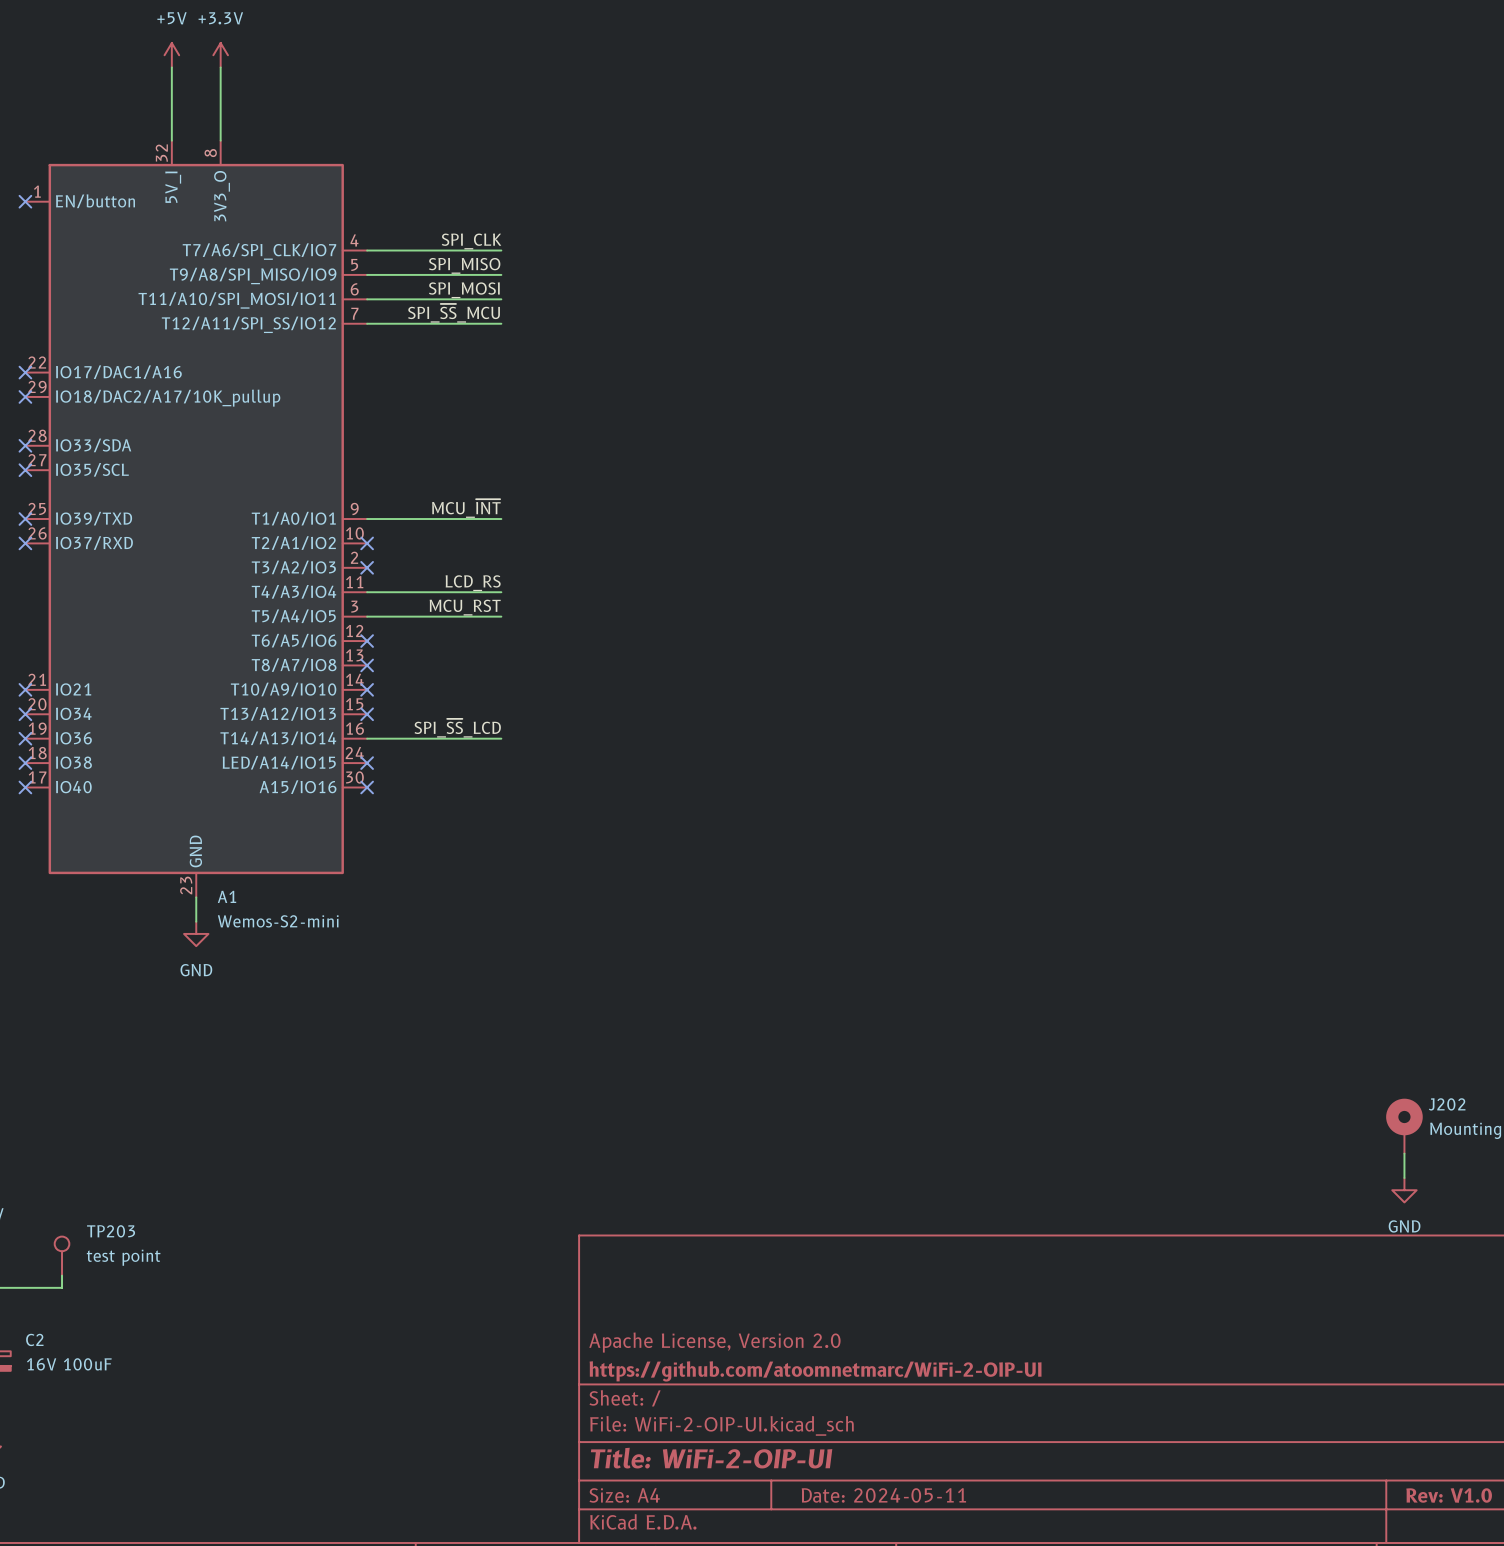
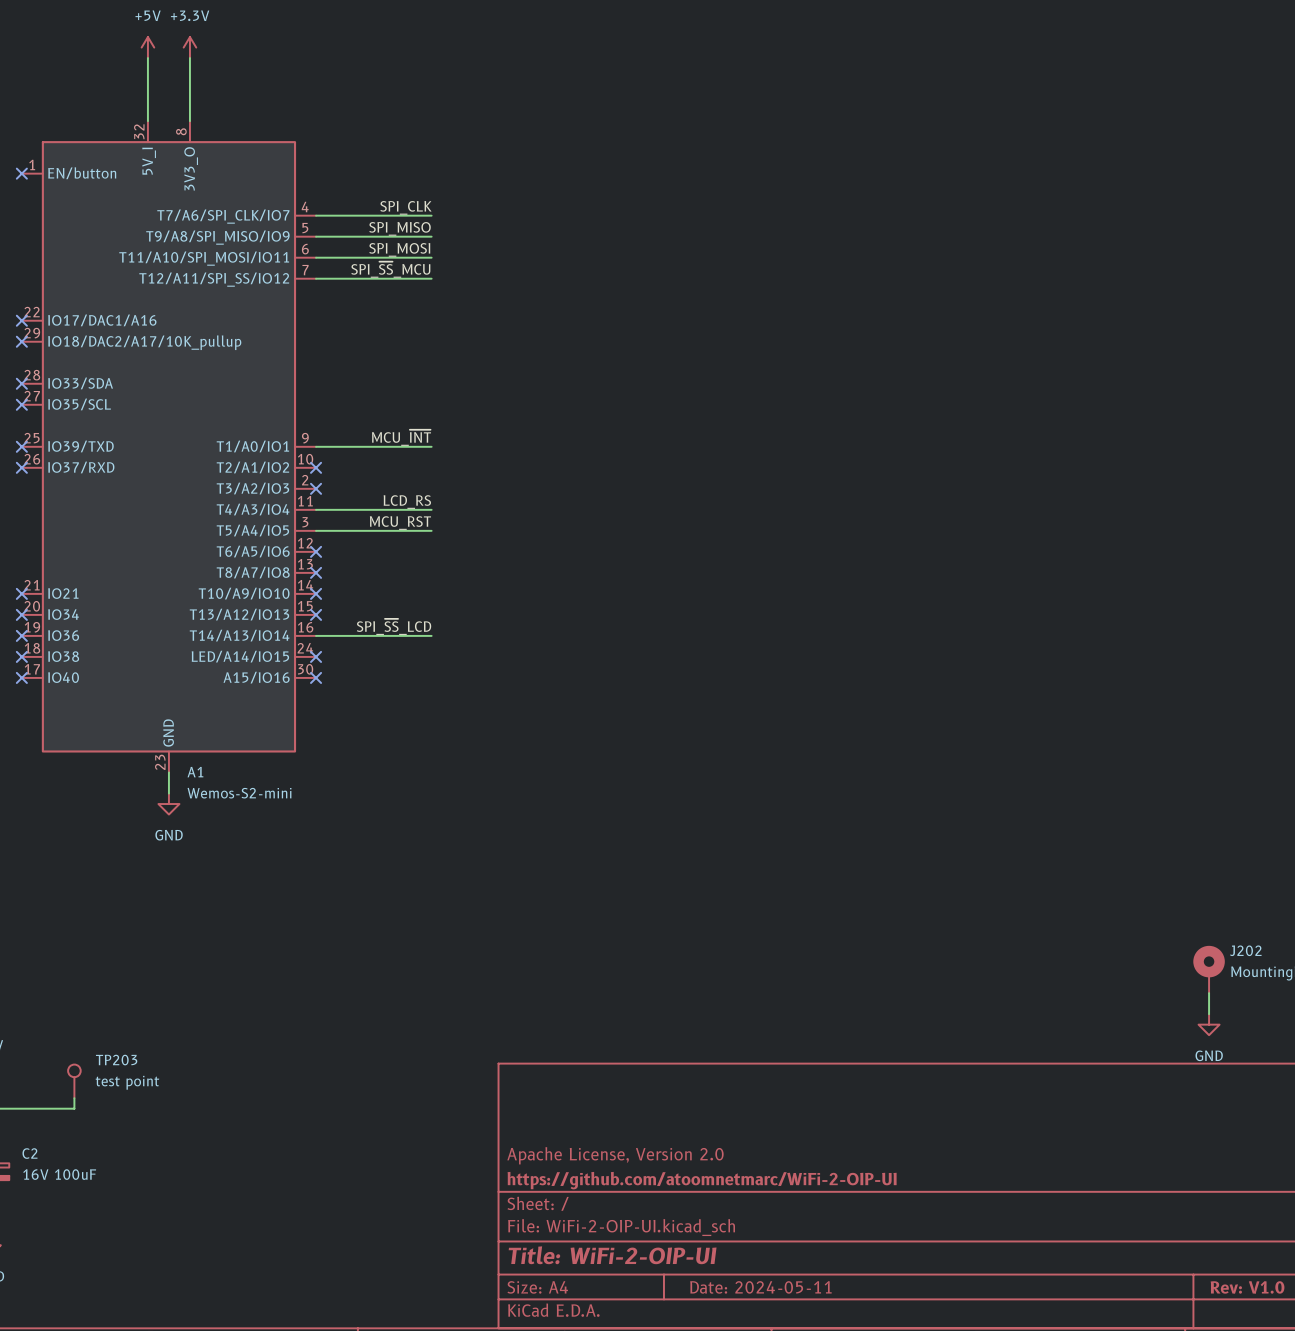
TP203 position: (62, 1256) -> (74, 1081)
wire: (62, 1275) (62, 1287) -> (74, 1098) (74, 1108) (53, 1108)

